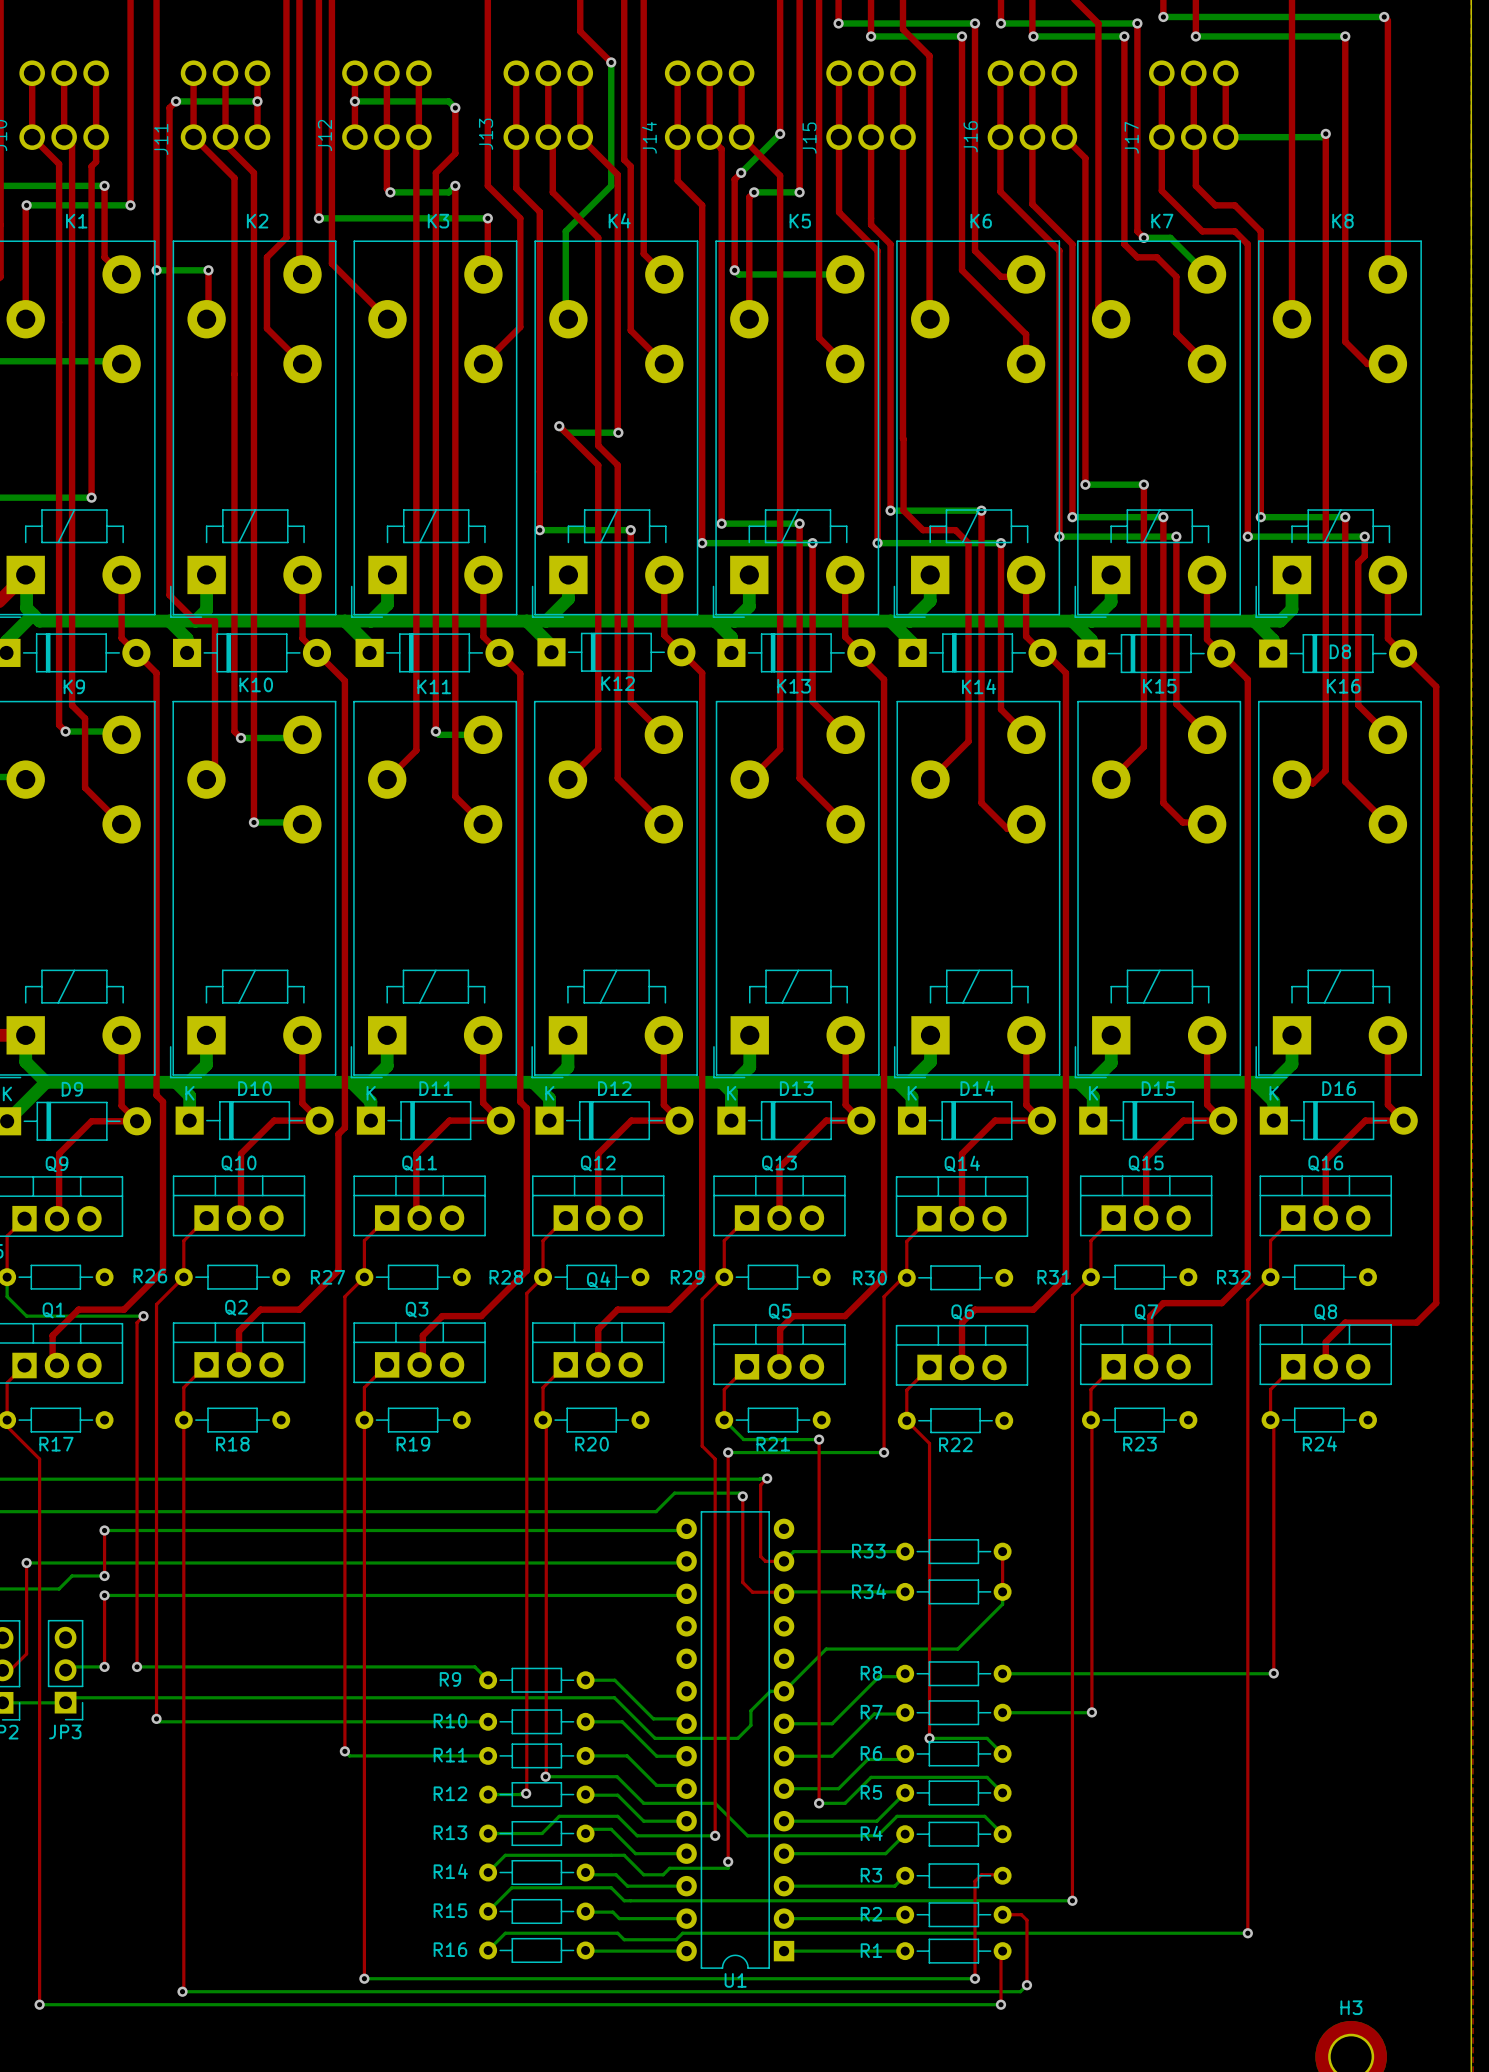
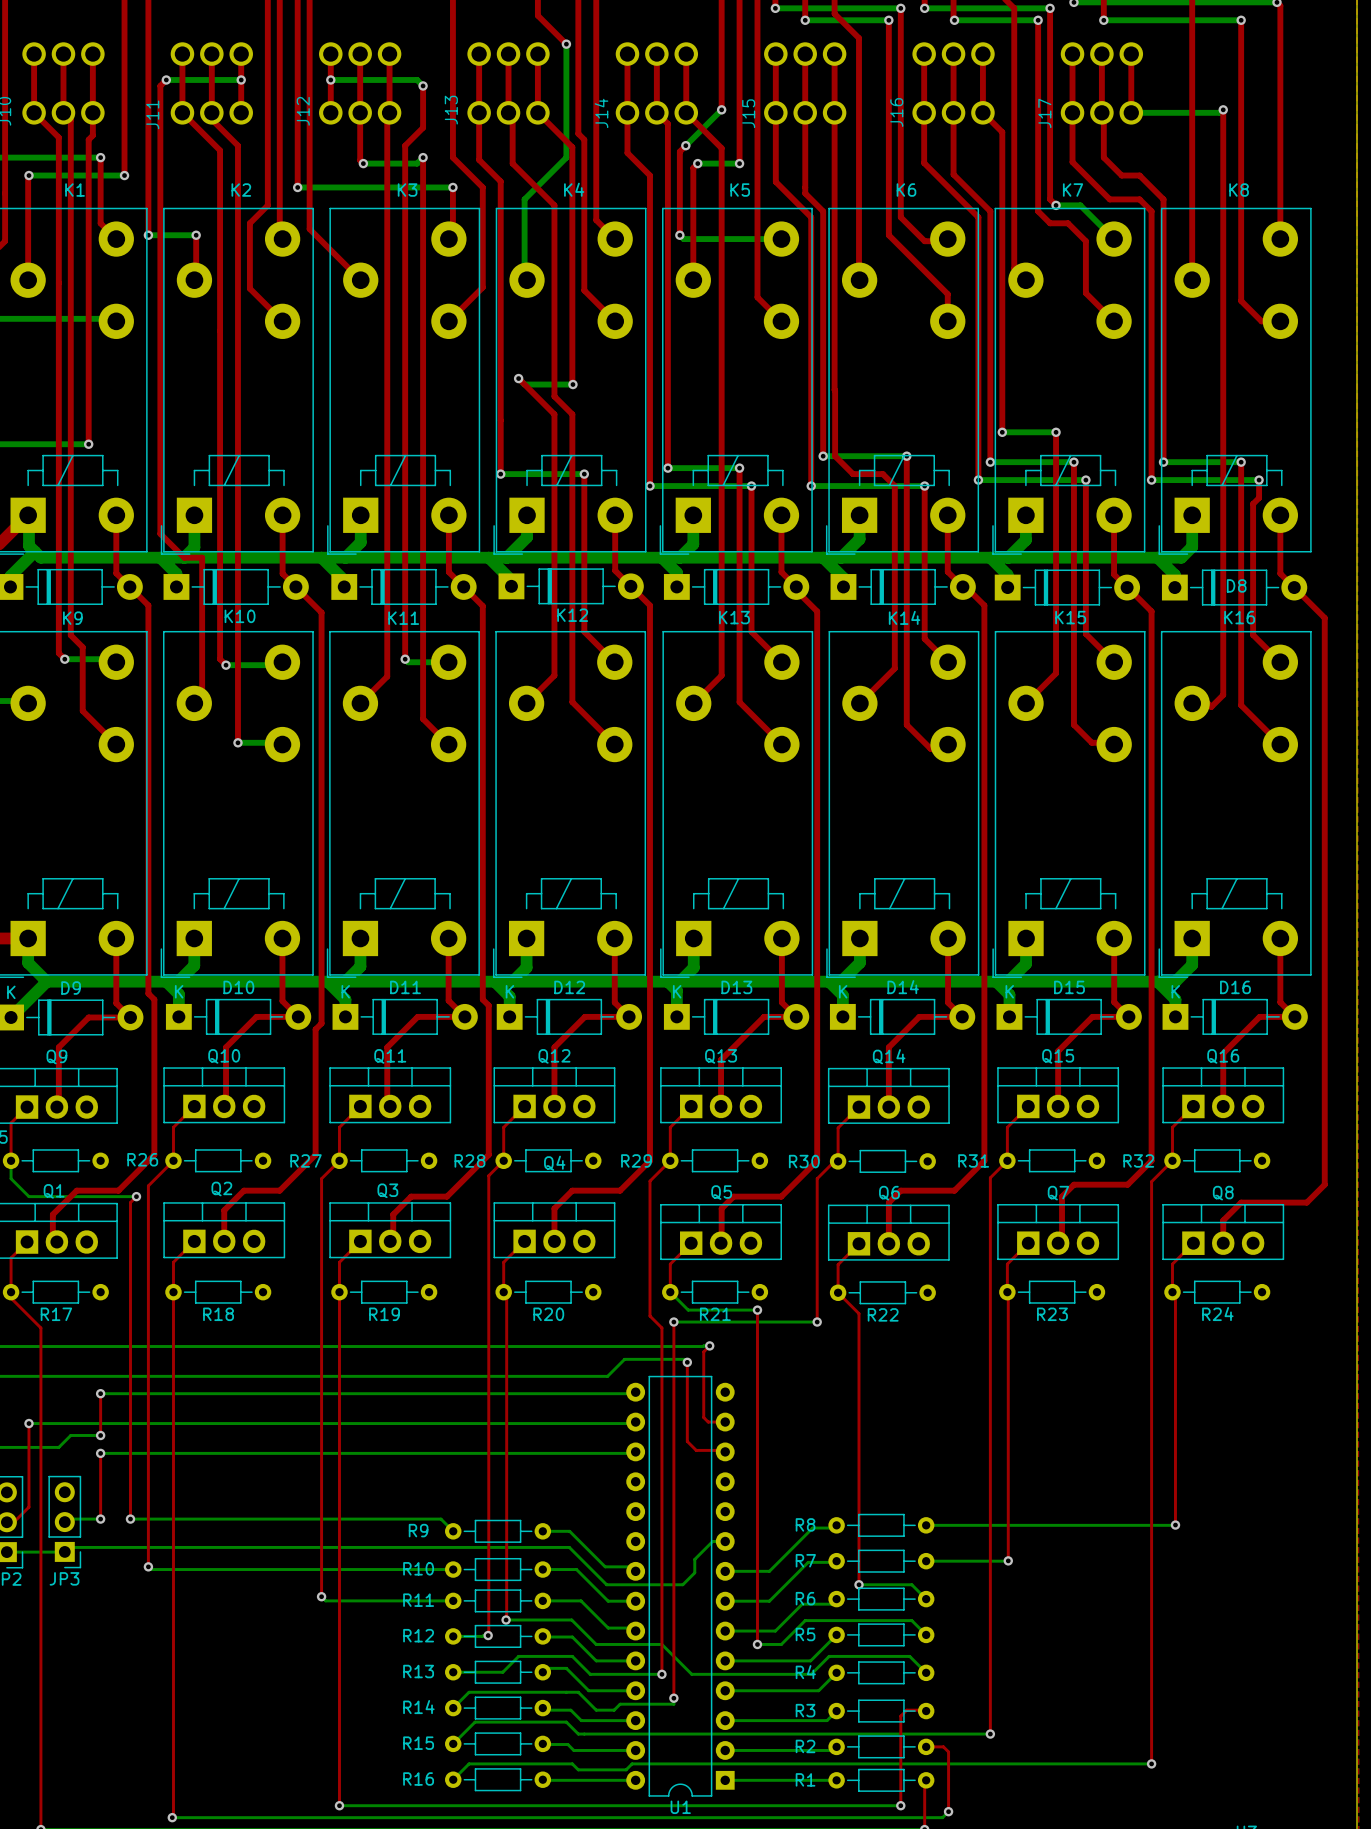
bottom track: (905, 1551) (793, 1551) (784, 1561) -> none
R33: (953, 1551) -> none
top track: (1002, 1551) (1002, 1591) -> none
bottom track: (905, 1591) (785, 1591) (784, 1593) -> none
R34: (953, 1591) -> none
bottom track: (1002, 1591) (1002, 1604) (957, 1649) (826, 1649) (784, 1691) -> none

